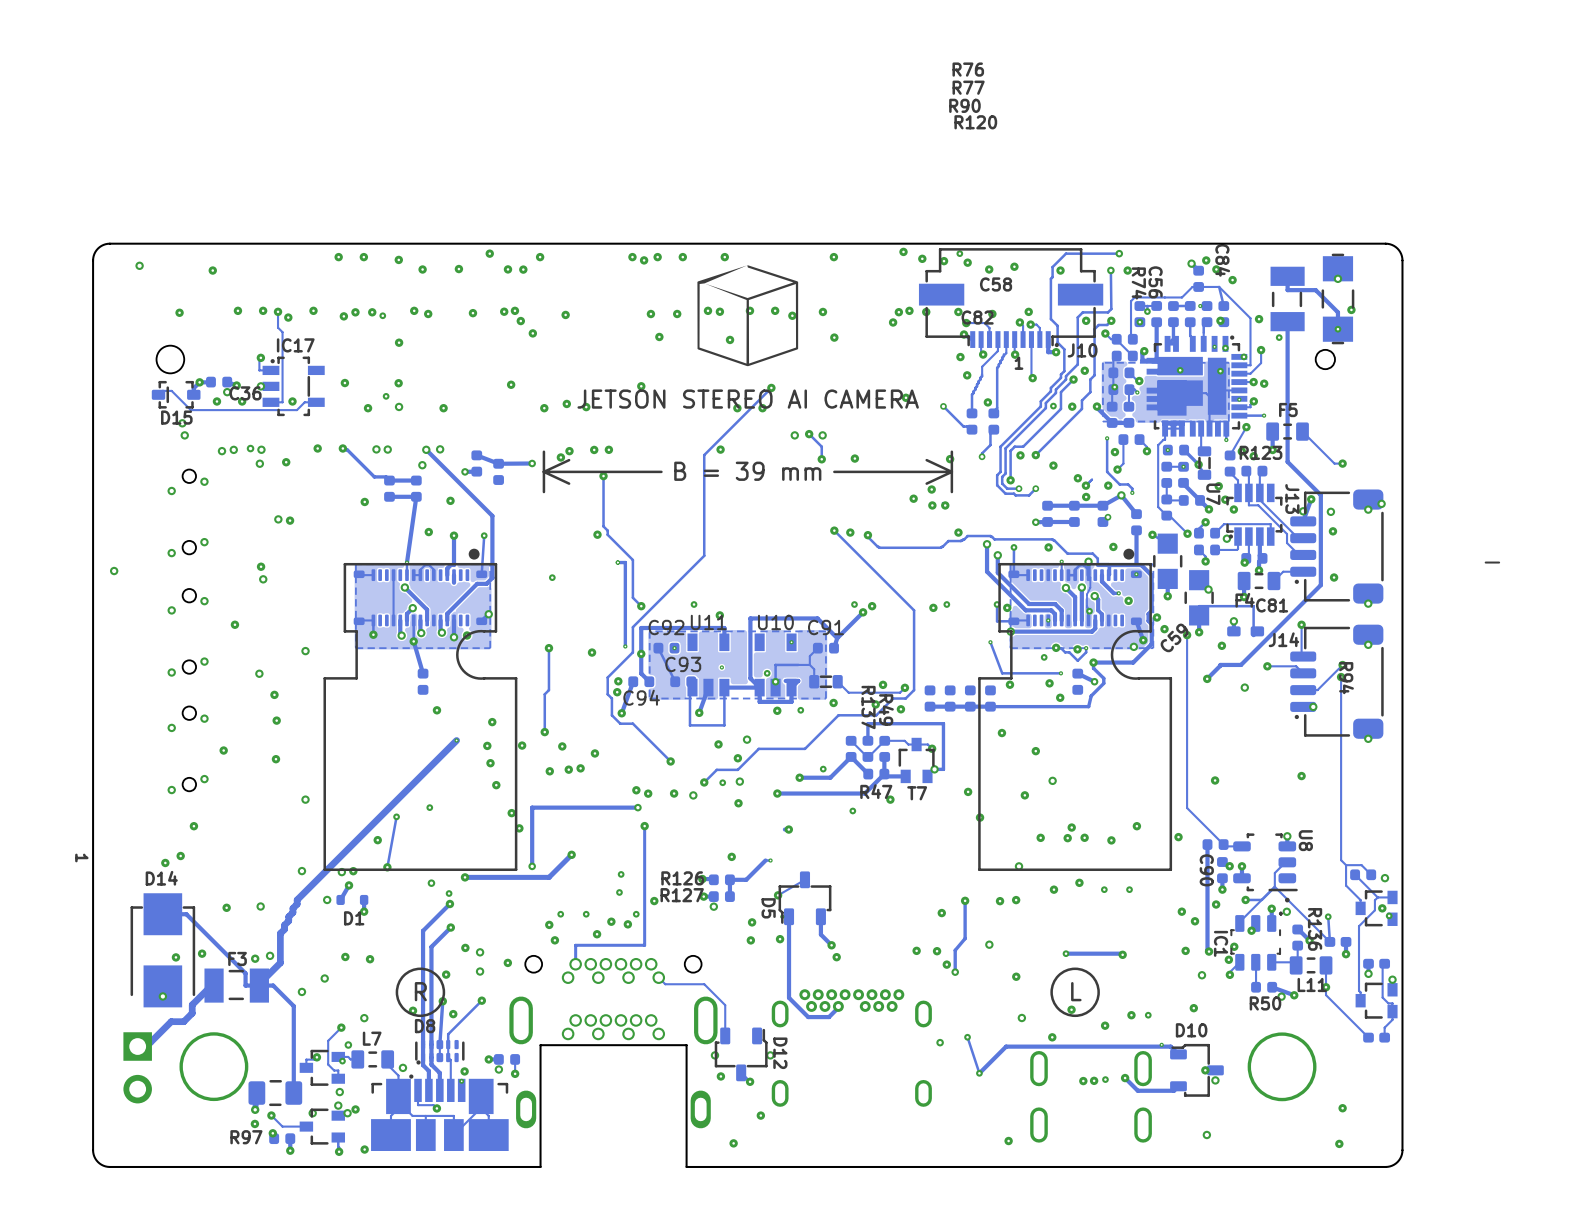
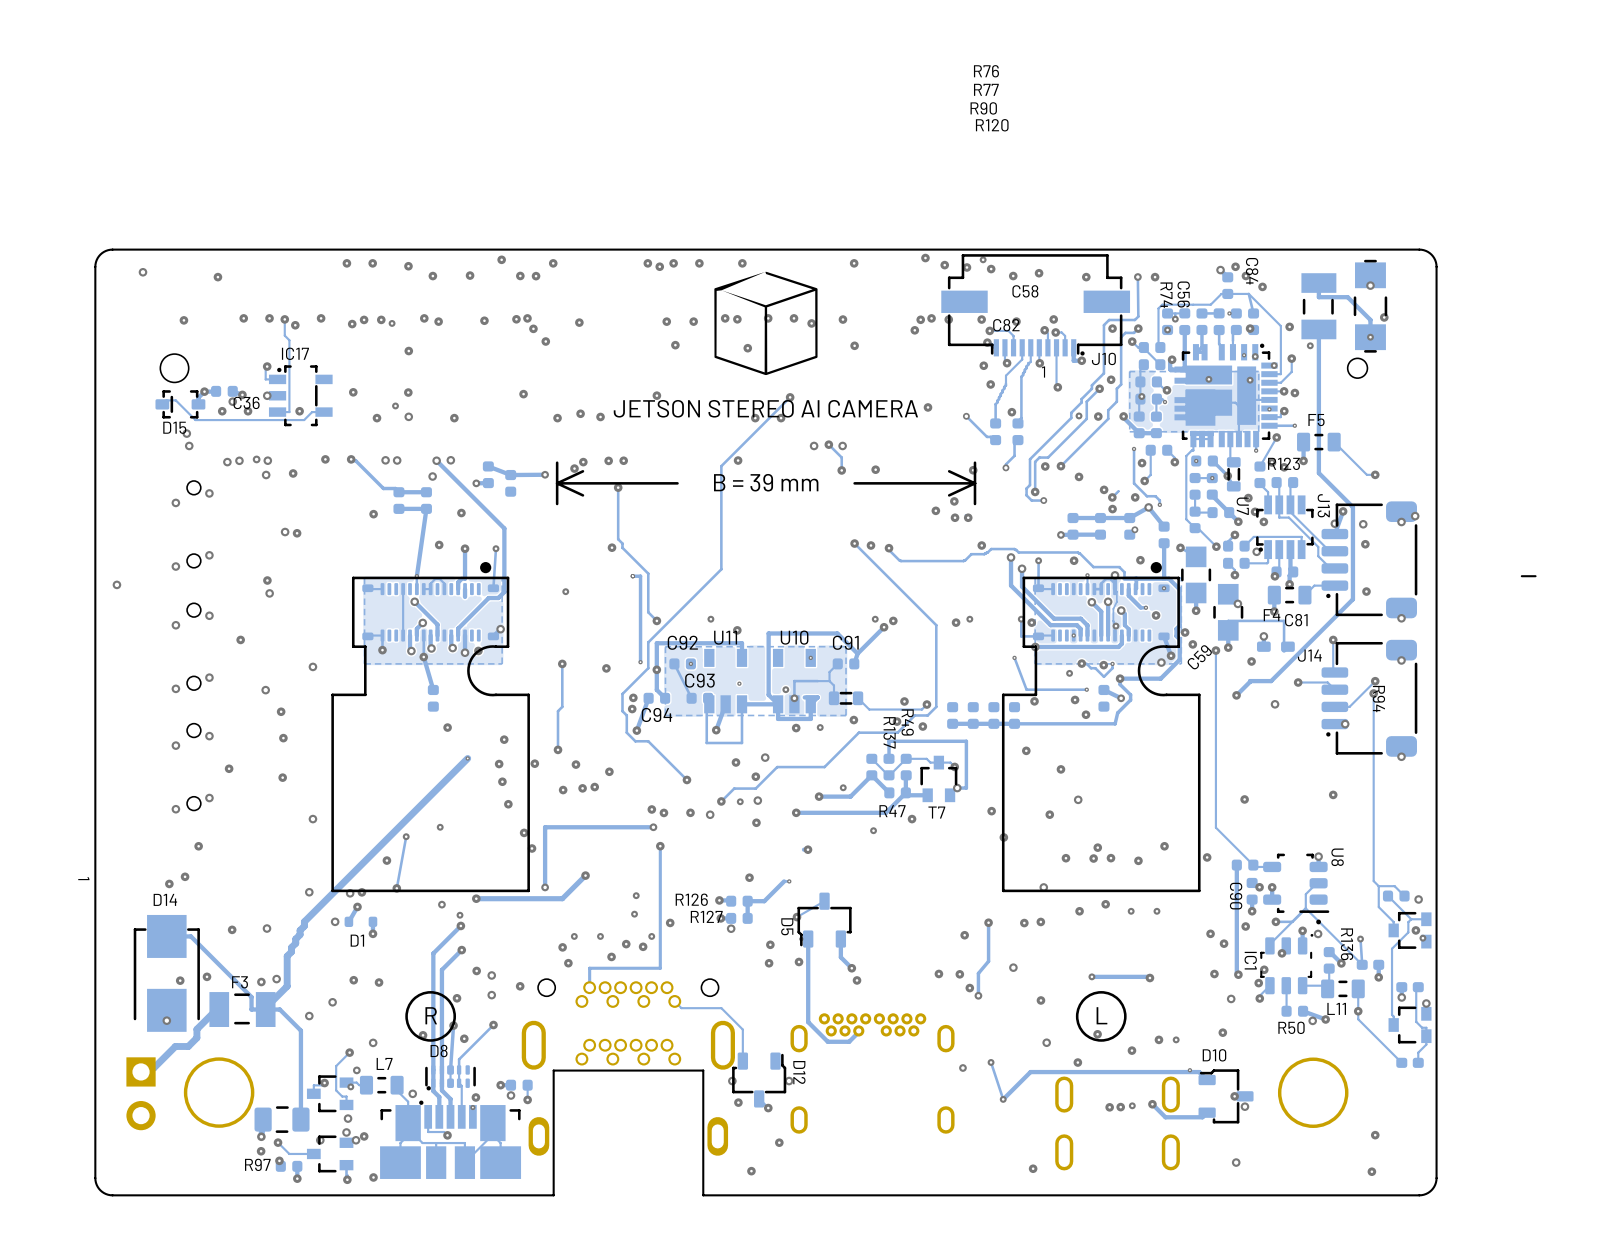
track: (1119, 253) (1066, 253) (1052, 267) (1050, 319) (1057, 325) (1057, 342) (1064, 349) (1064, 371) (1060, 374) (1060, 377) (1050, 387) (1050, 391) (1040, 401) (1040, 406) (1000, 446) (1000, 471) (997, 475) (997, 485) (1005, 493) (1029, 495) (1035, 488) -> none
via: (1119, 253) -> none
via: (1035, 488) -> none

